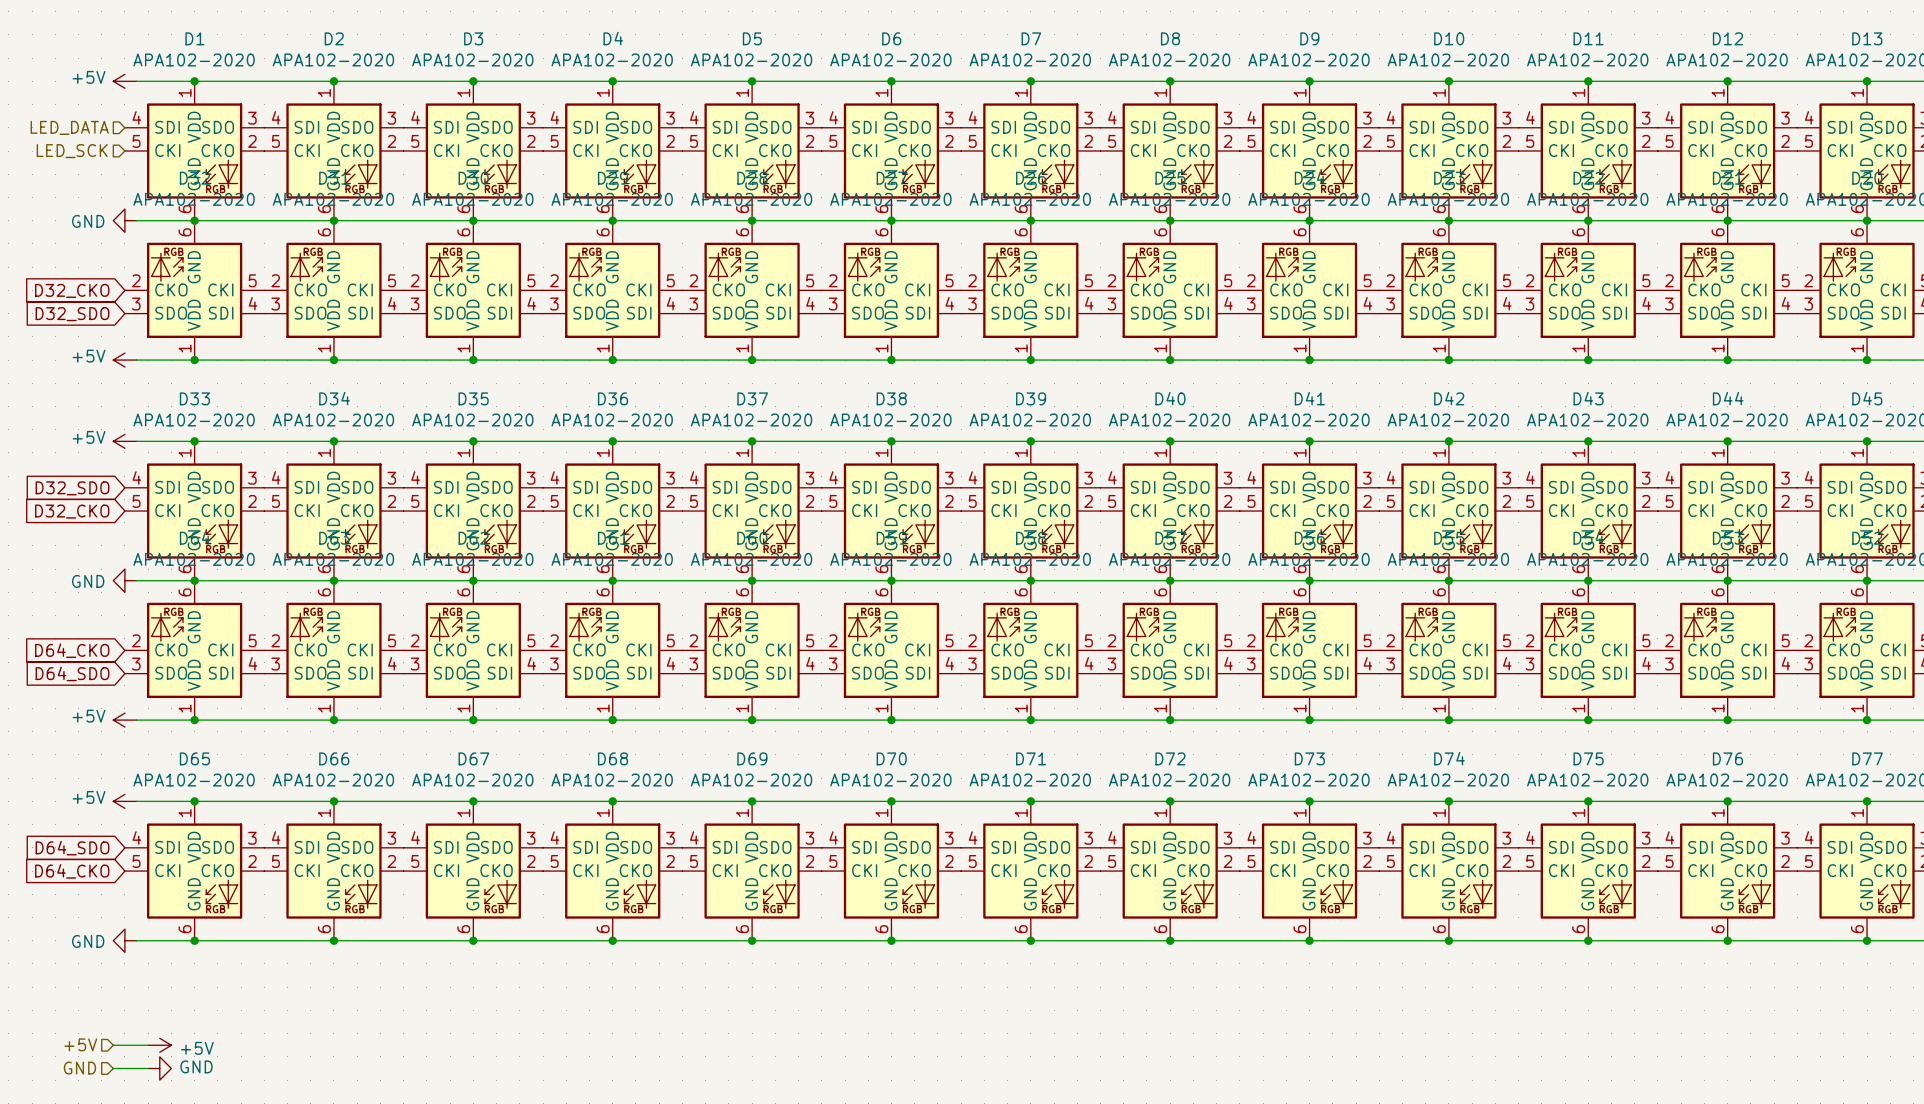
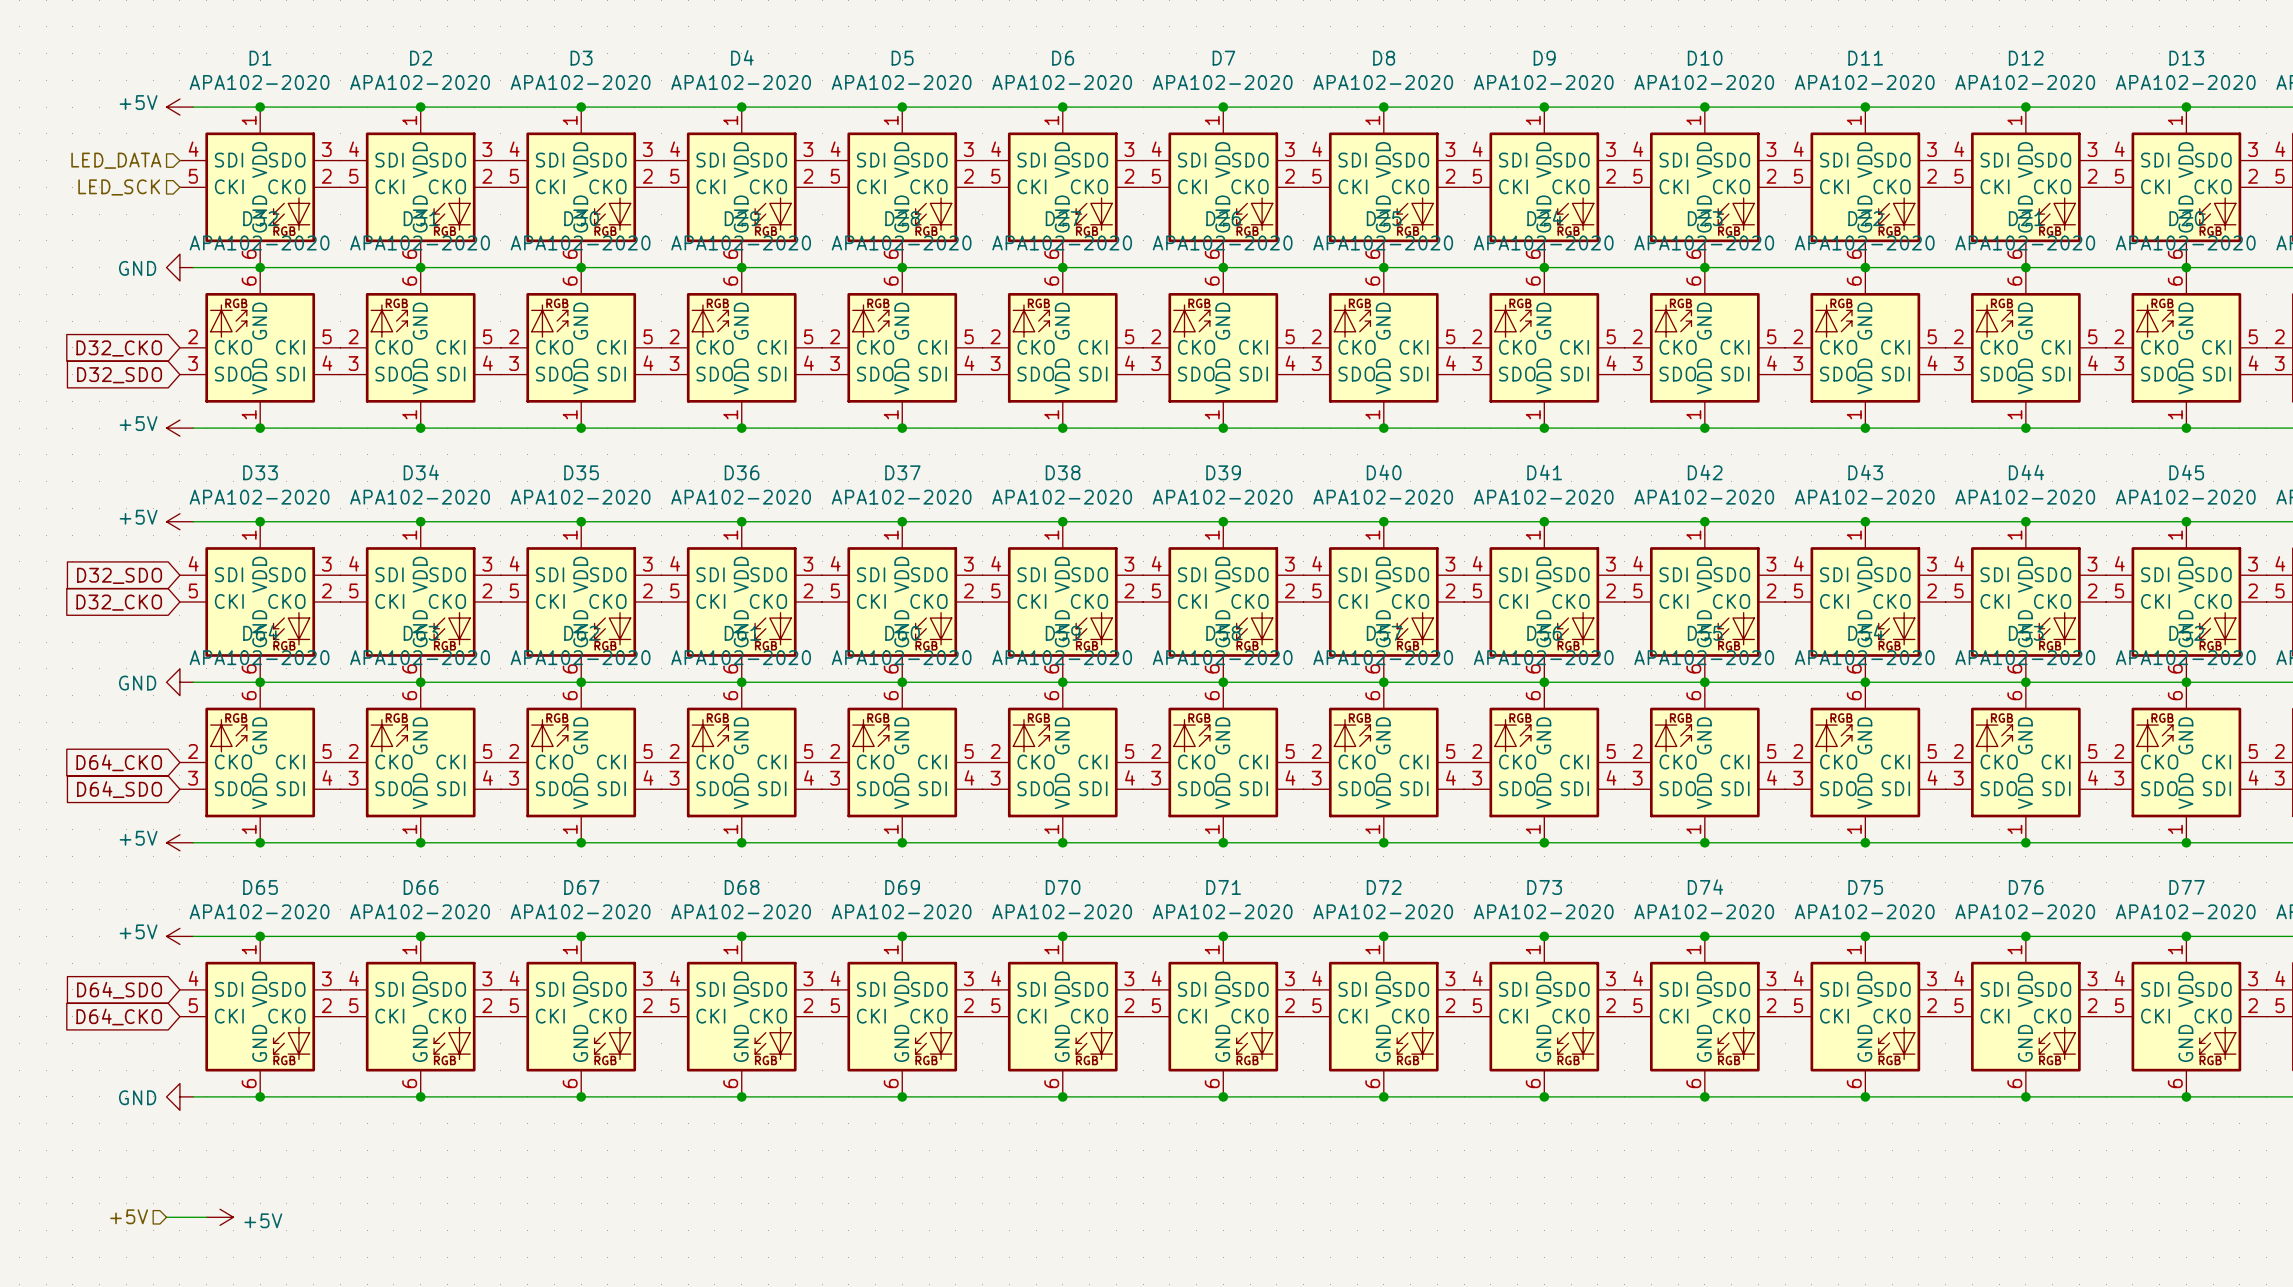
hierarchical label: GND (79, 1068) -> none
wire: (113, 1068) (148, 1068) -> none
power symbol: GND (159, 1068) -> none

